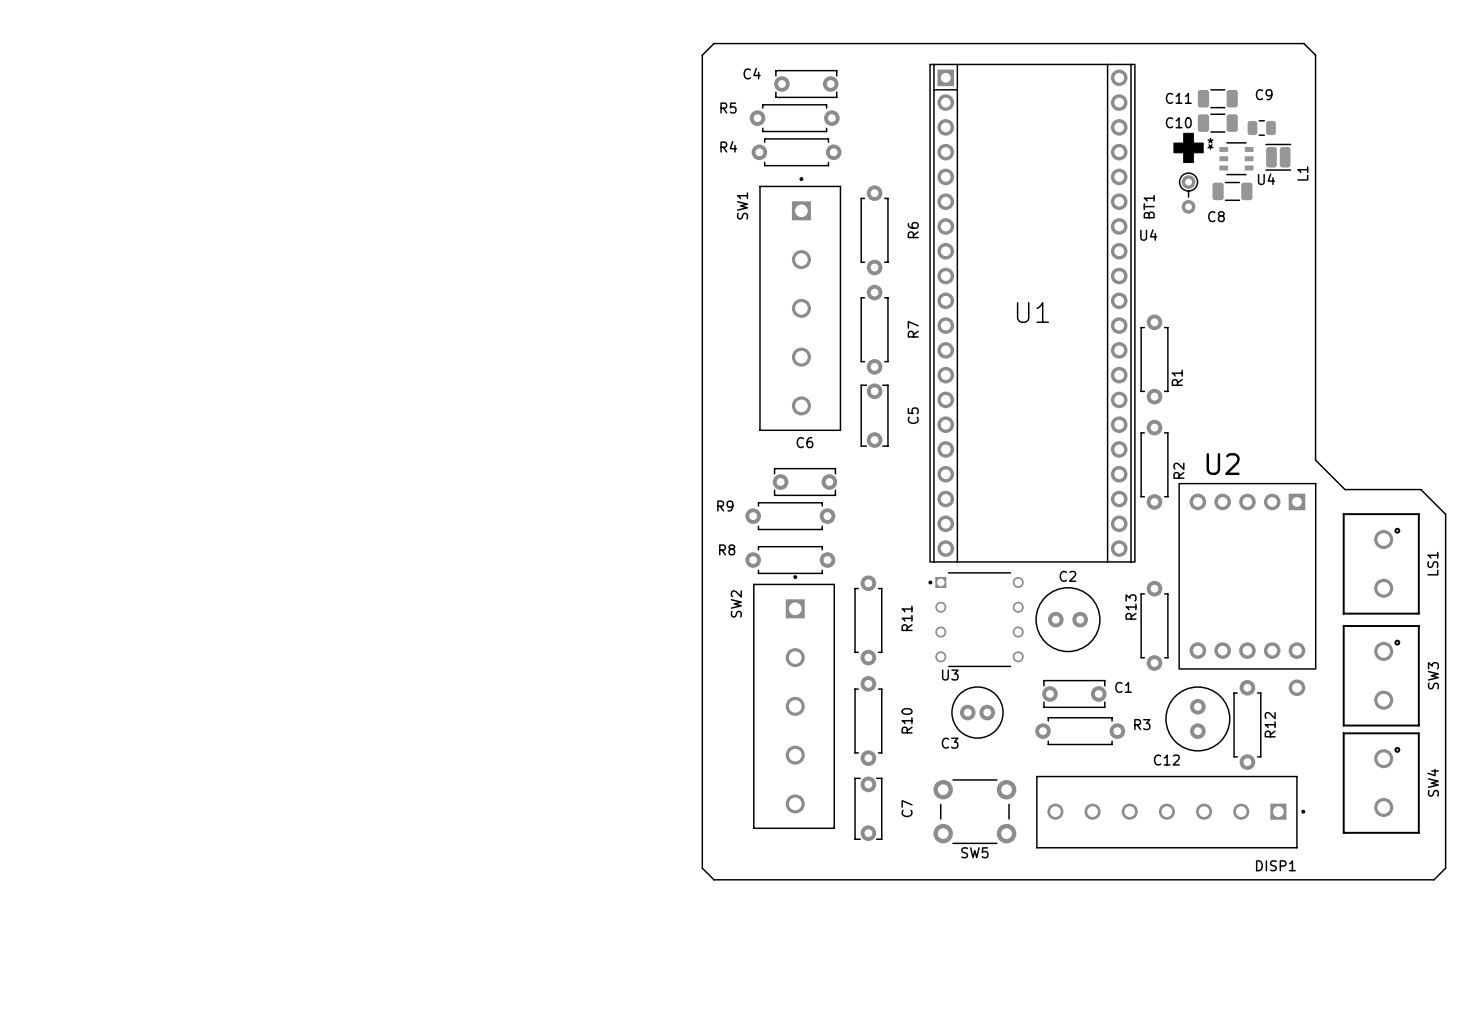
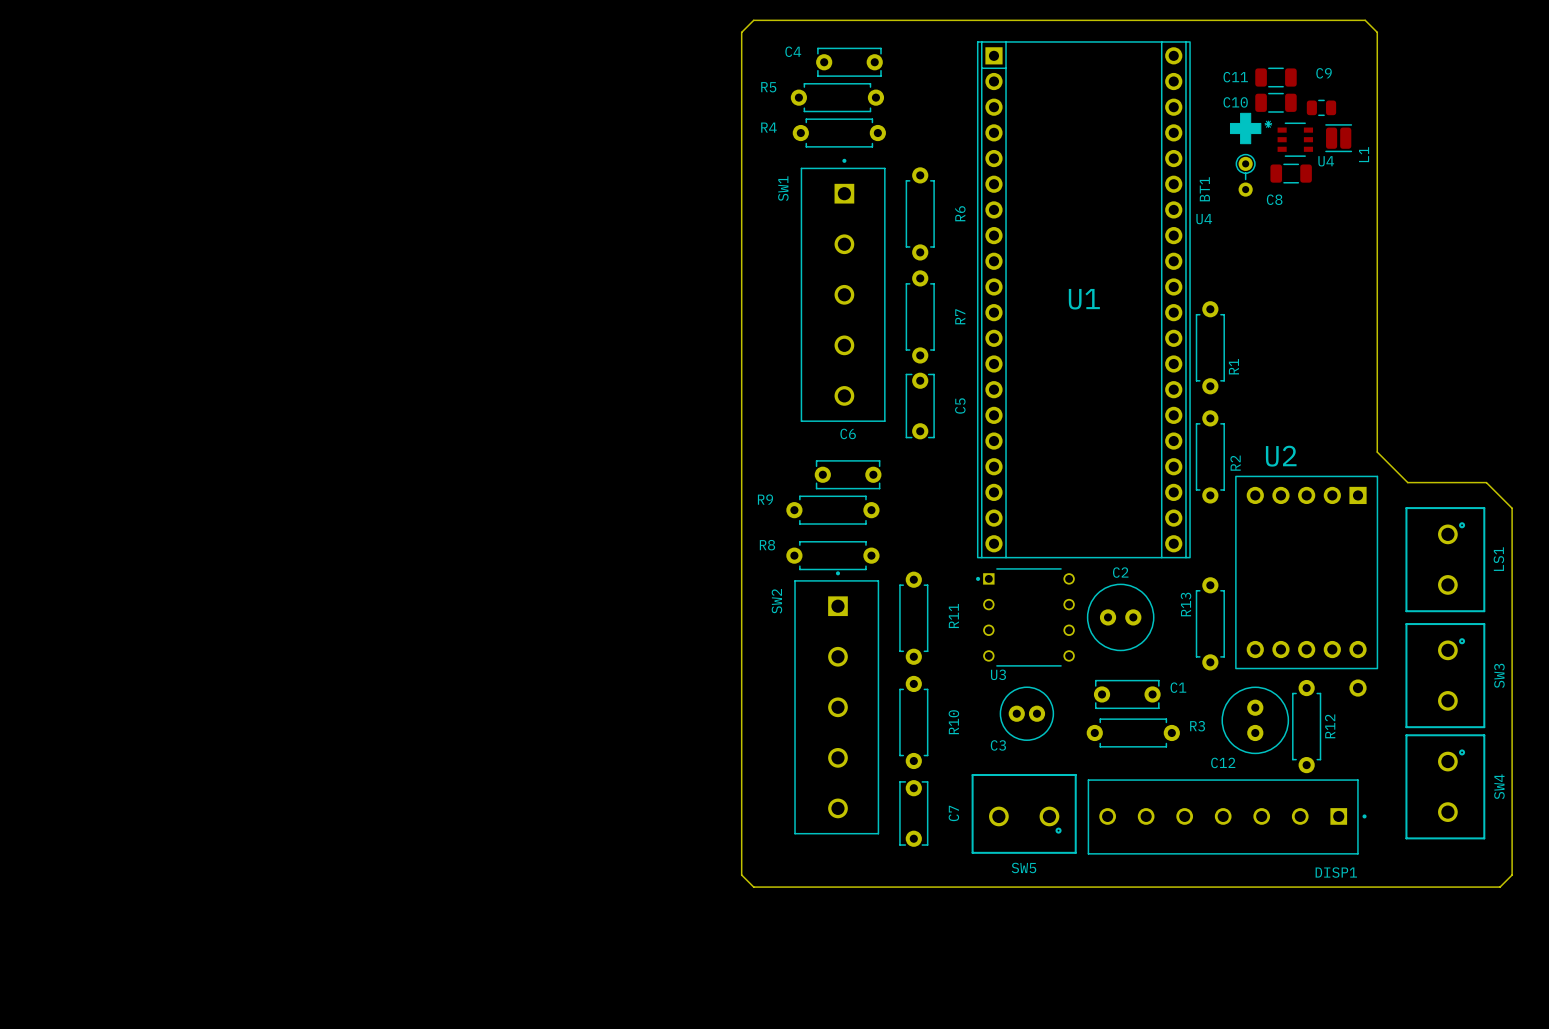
SW5 footprint: [933, 779, 1017, 844] -> [971, 773, 1077, 854]

